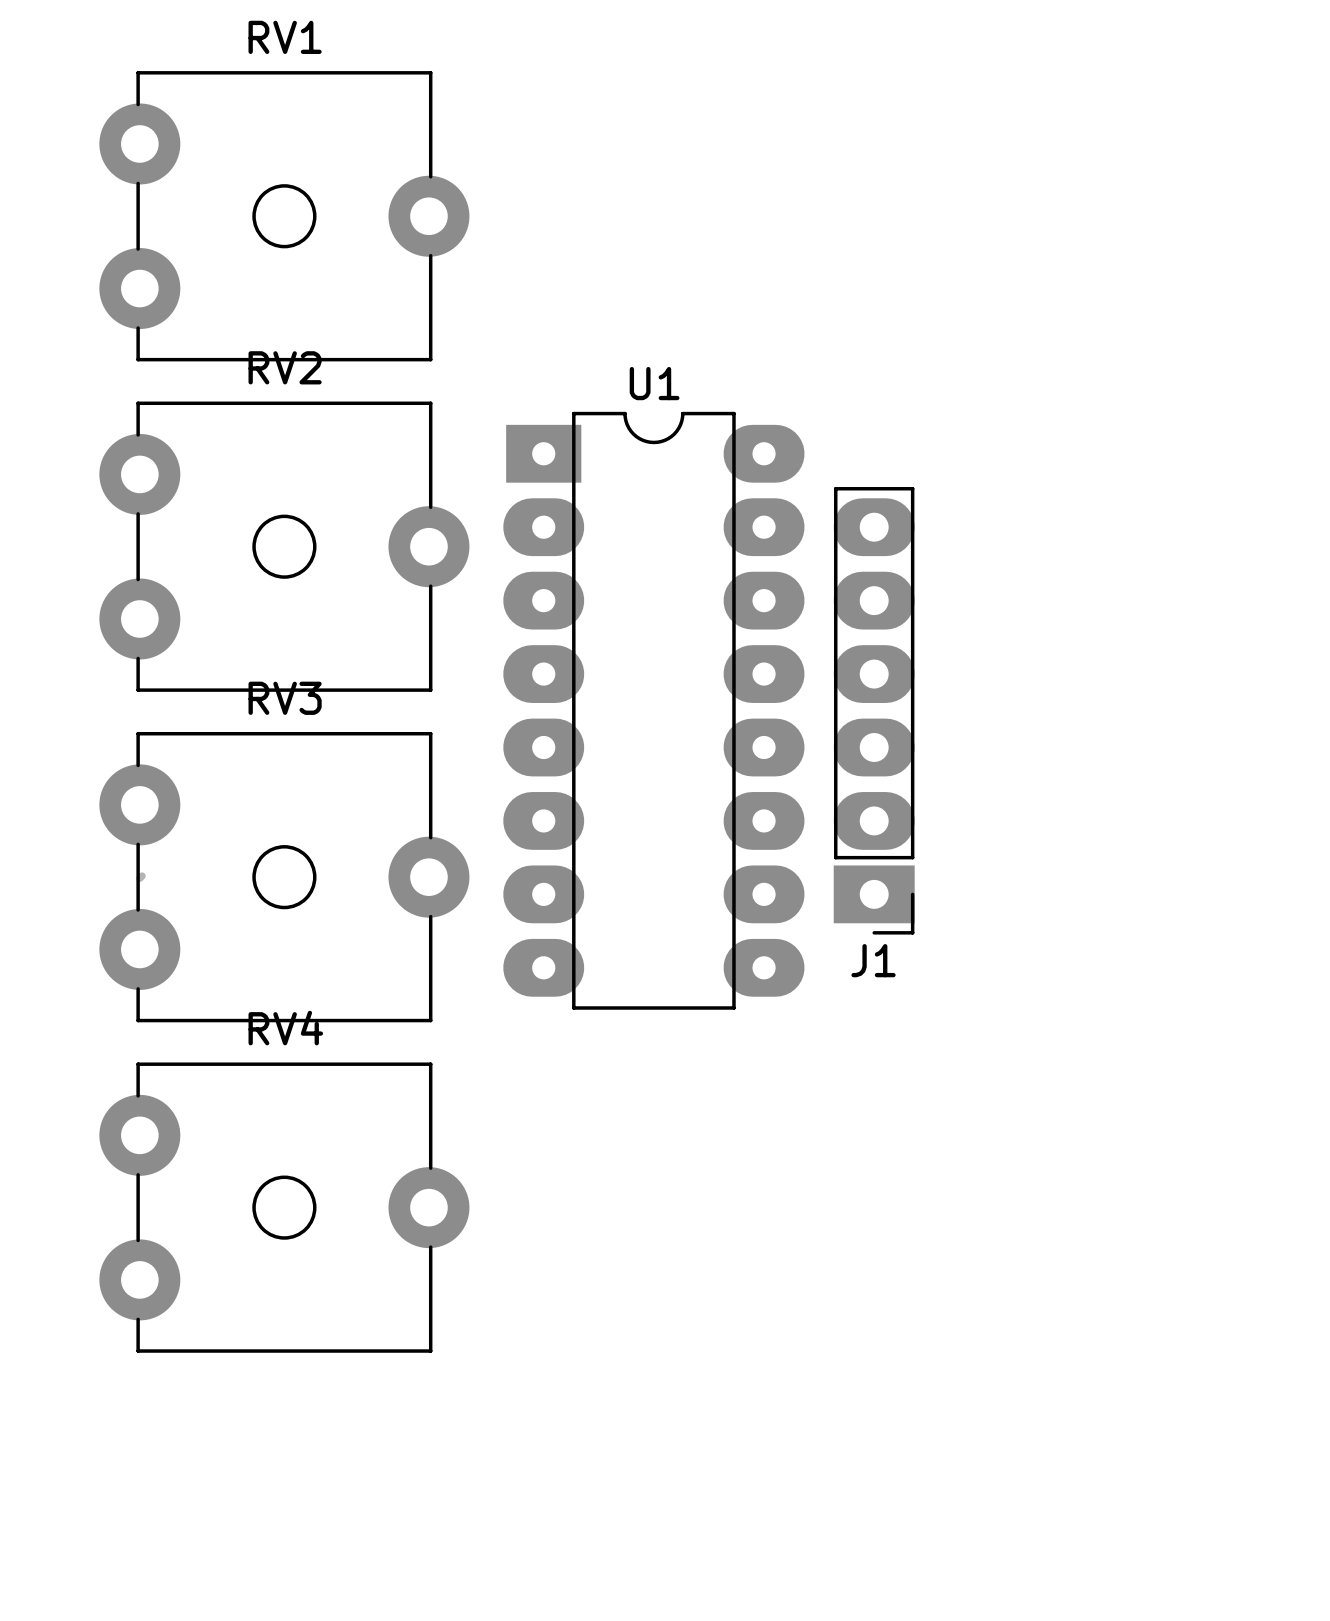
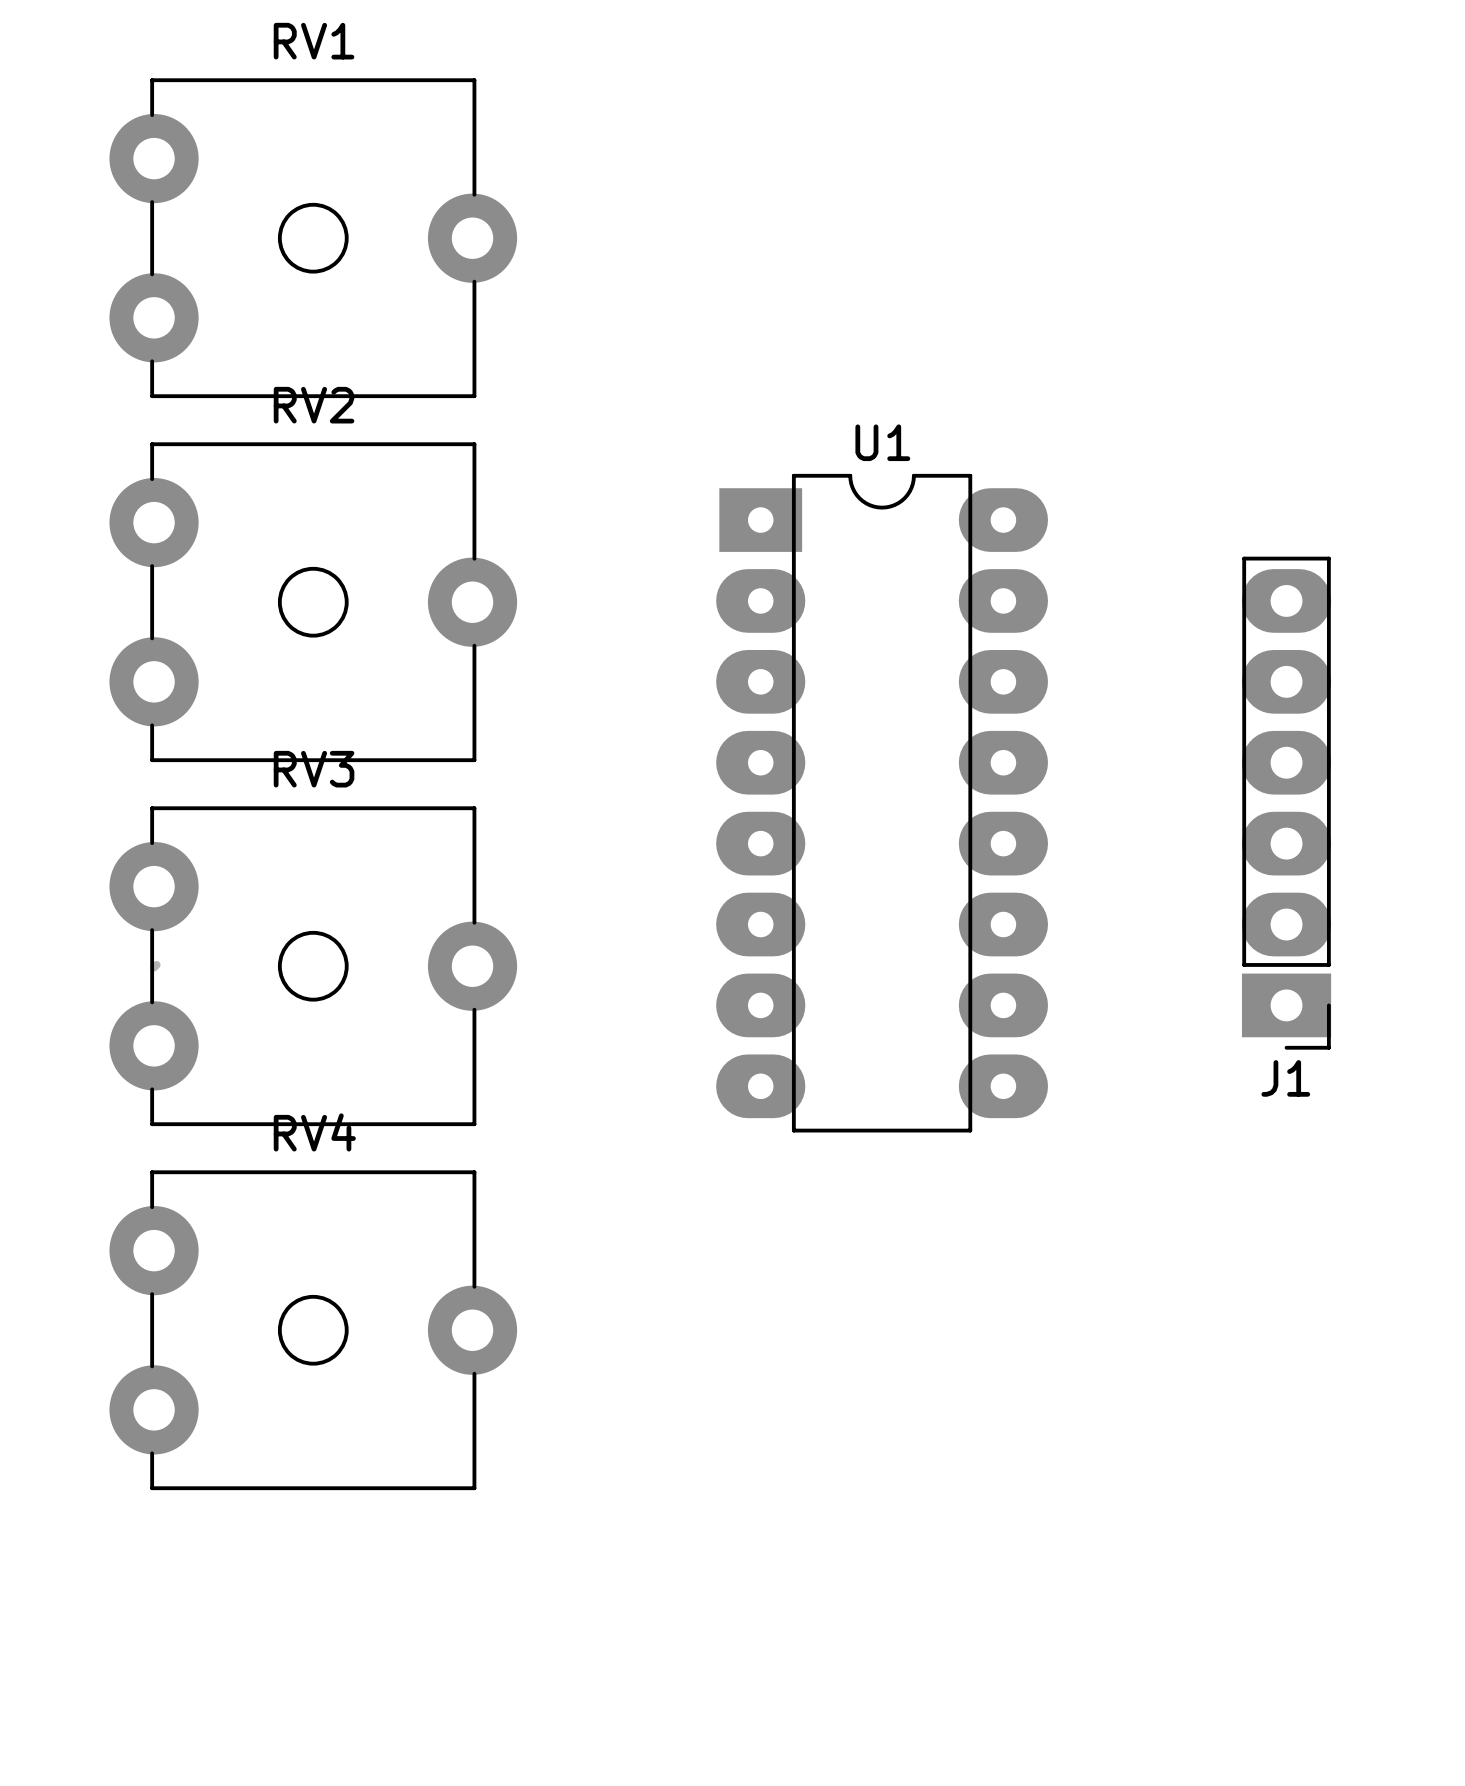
U1 position: (653, 710) -> (882, 803)
J1 position: (874, 710) -> (1286, 803)

